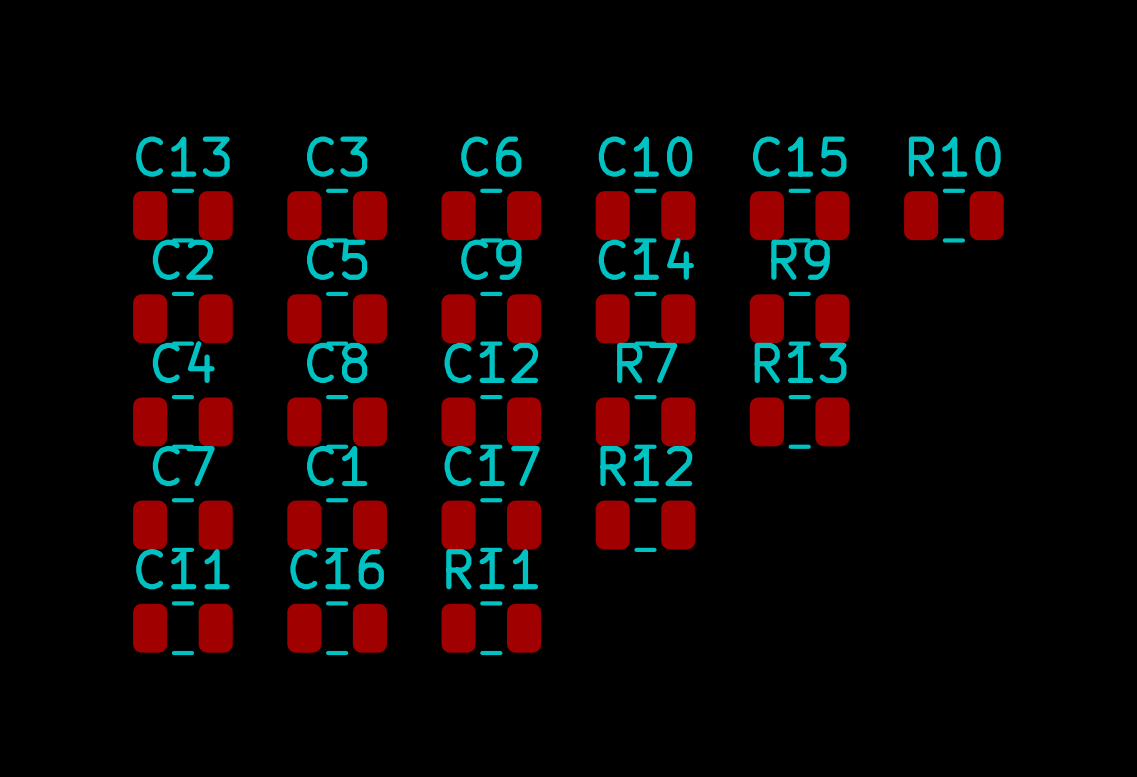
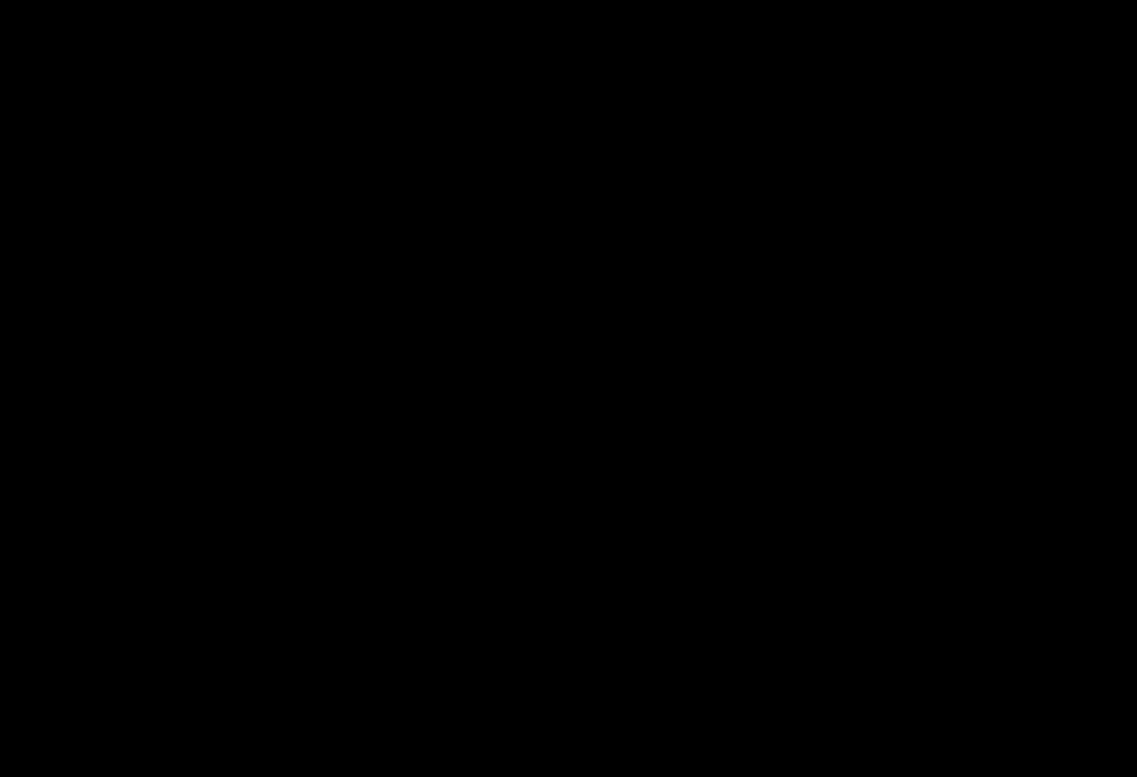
C13: (182, 215) -> none
C3: (337, 215) -> none
C6: (491, 215) -> none
C10: (645, 215) -> none
C15: (799, 215) -> none
R10: (953, 215) -> none
C2: (182, 318) -> none
C5: (337, 318) -> none
C9: (491, 318) -> none
C14: (645, 318) -> none
R9: (799, 318) -> none
C4: (182, 421) -> none
C8: (337, 421) -> none
C12: (491, 421) -> none
R7: (645, 421) -> none
R13: (799, 421) -> none
C7: (182, 525) -> none
C1: (337, 525) -> none
C17: (491, 525) -> none
R12: (645, 525) -> none
C11: (182, 628) -> none
C16: (337, 628) -> none
R11: (491, 628) -> none

